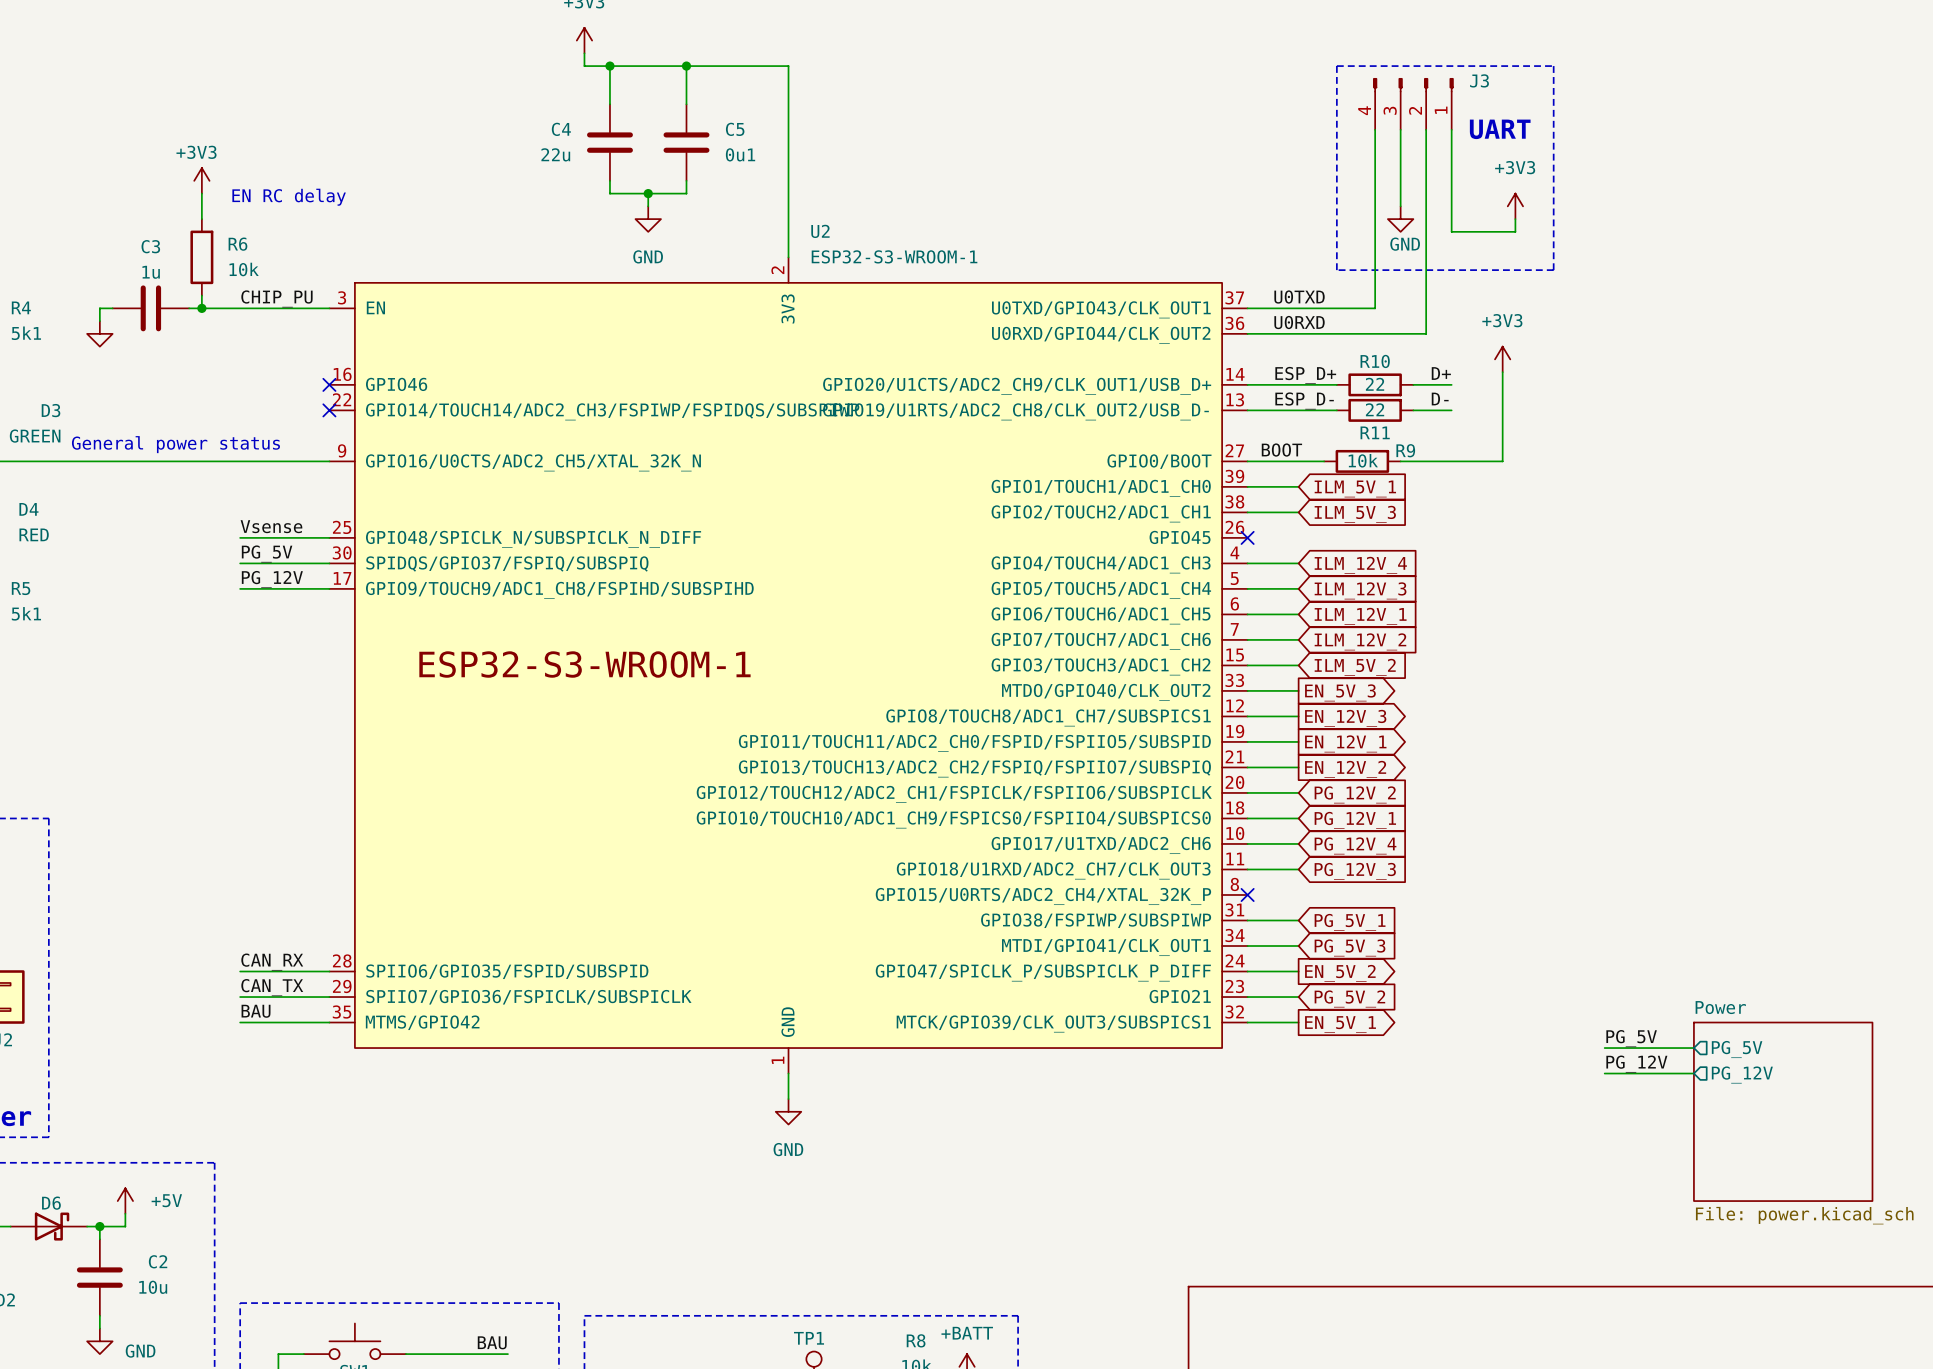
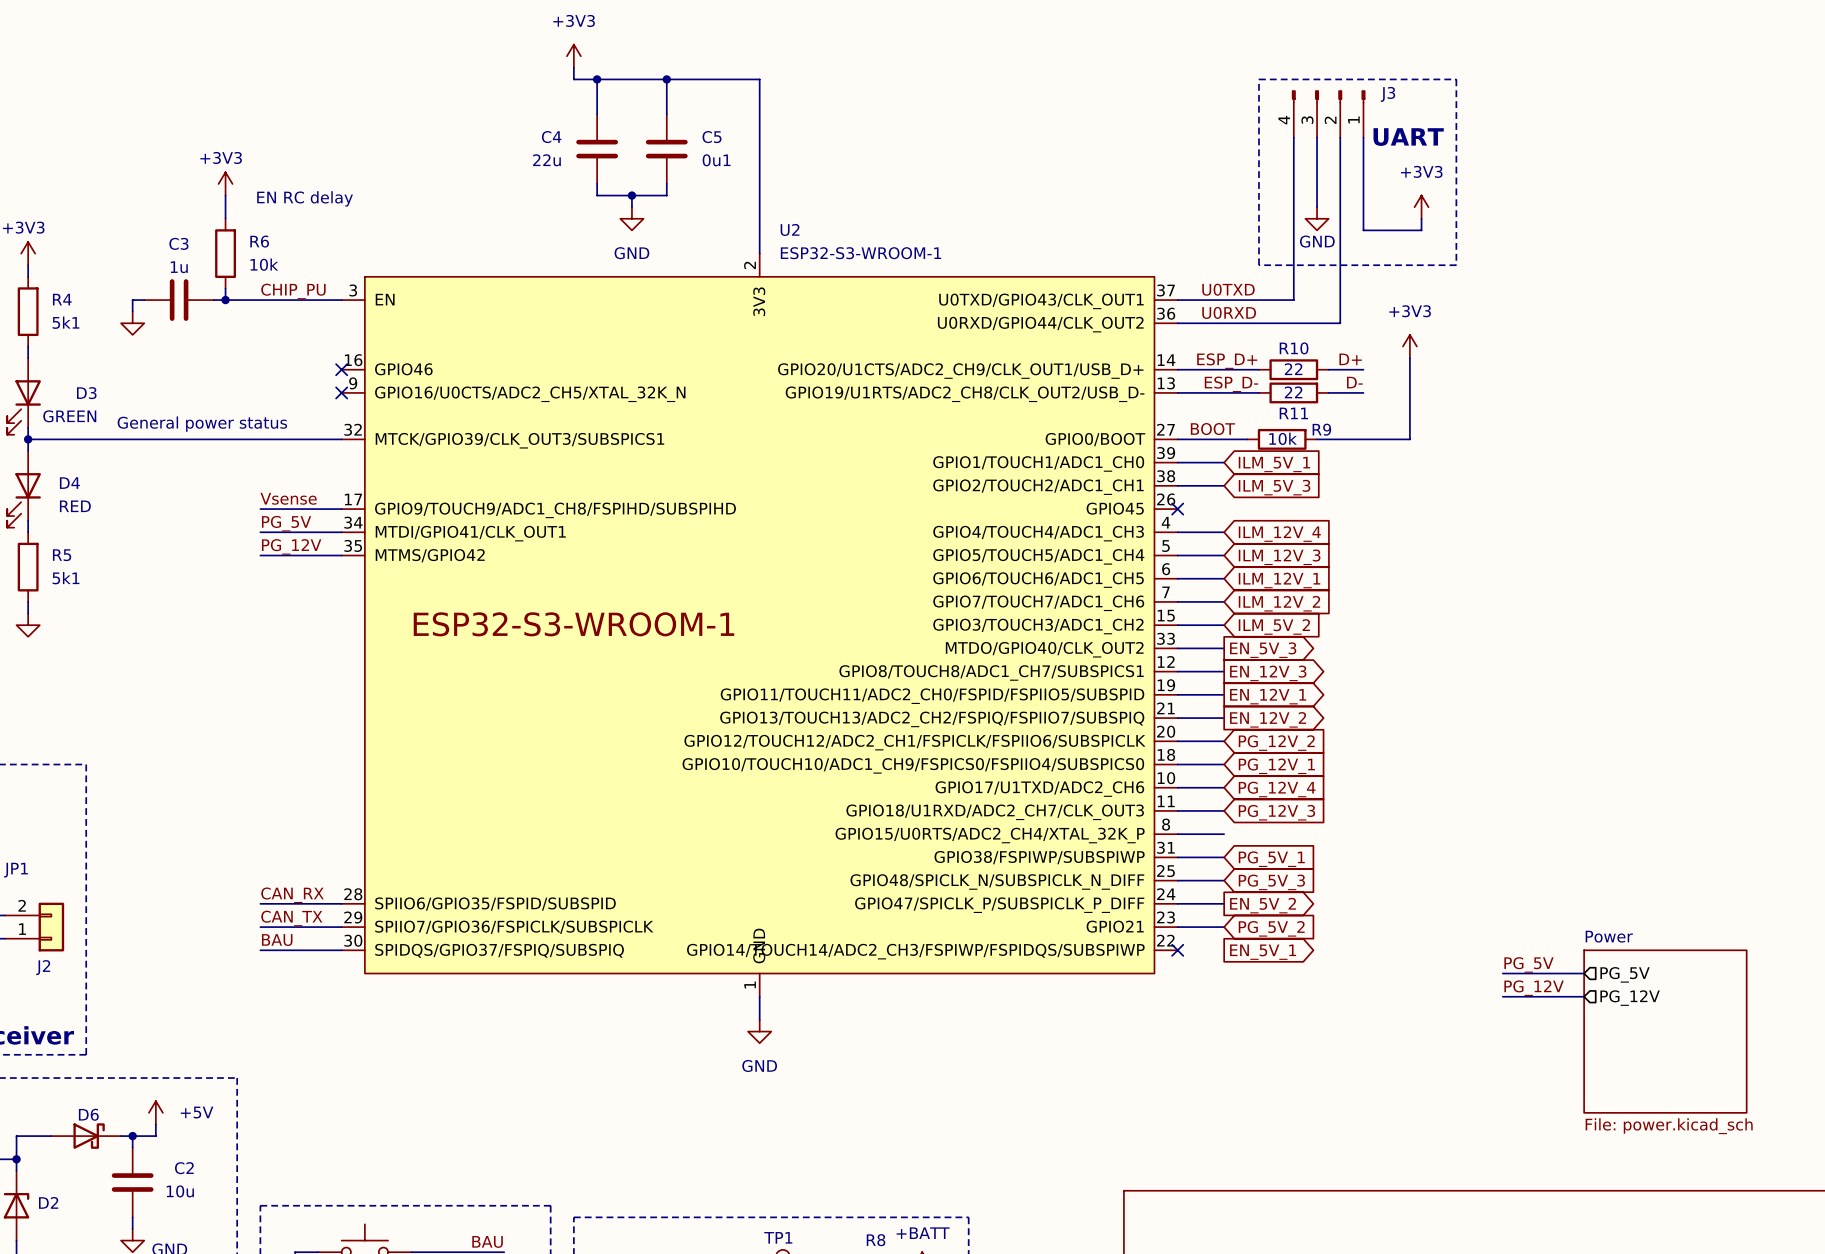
U2 symbol: [329, 257, 1248, 1074] -> [341, 253, 1178, 997]
no-connect mark: (1247, 894) -> none
wire: (1247, 1022) (1298, 1022) -> (1177, 834) (1224, 834)
no-connect mark: none -> (1177, 950)

